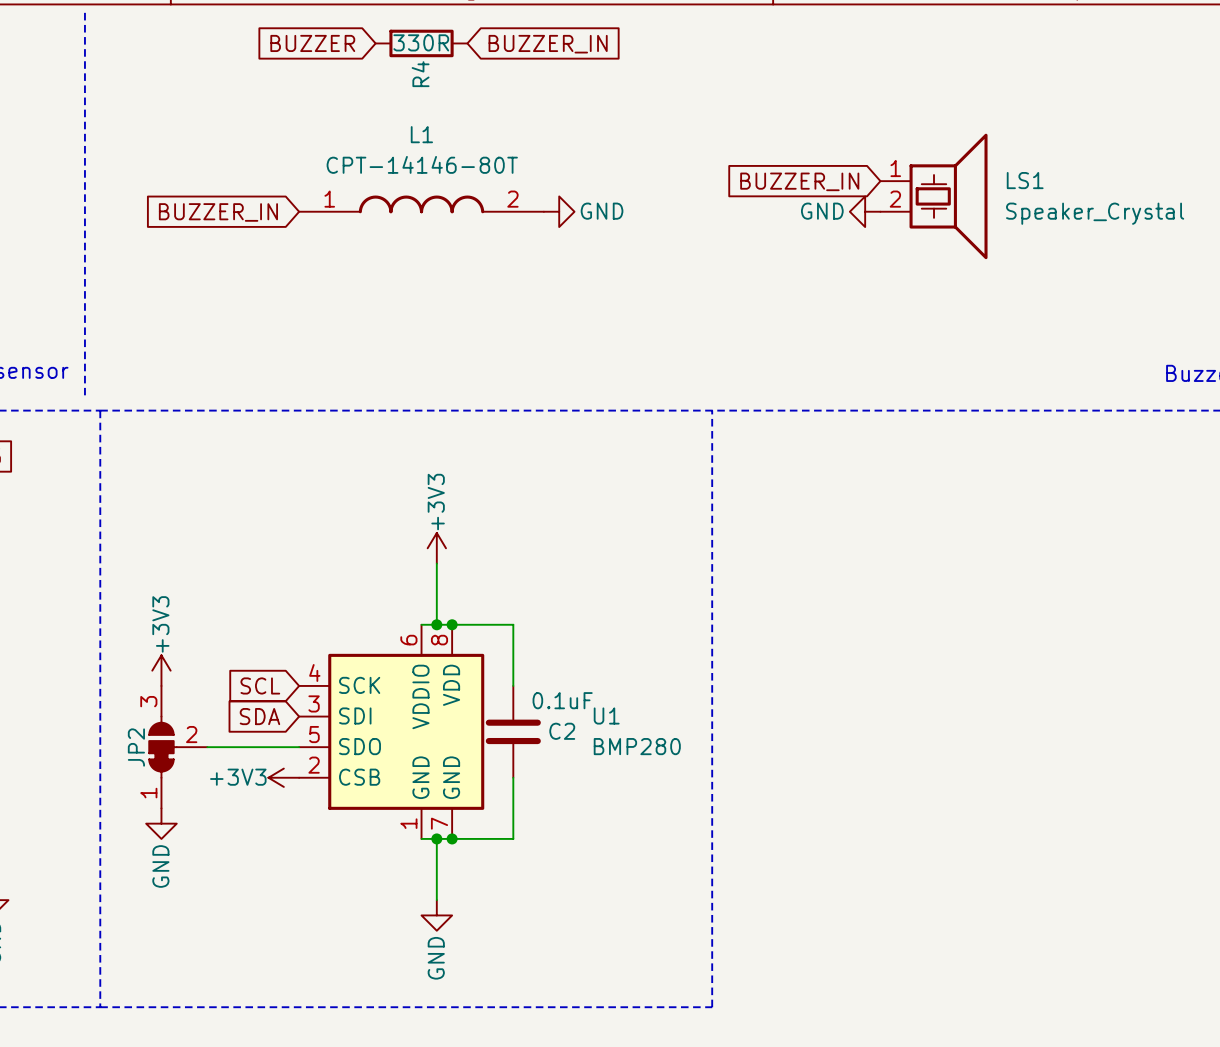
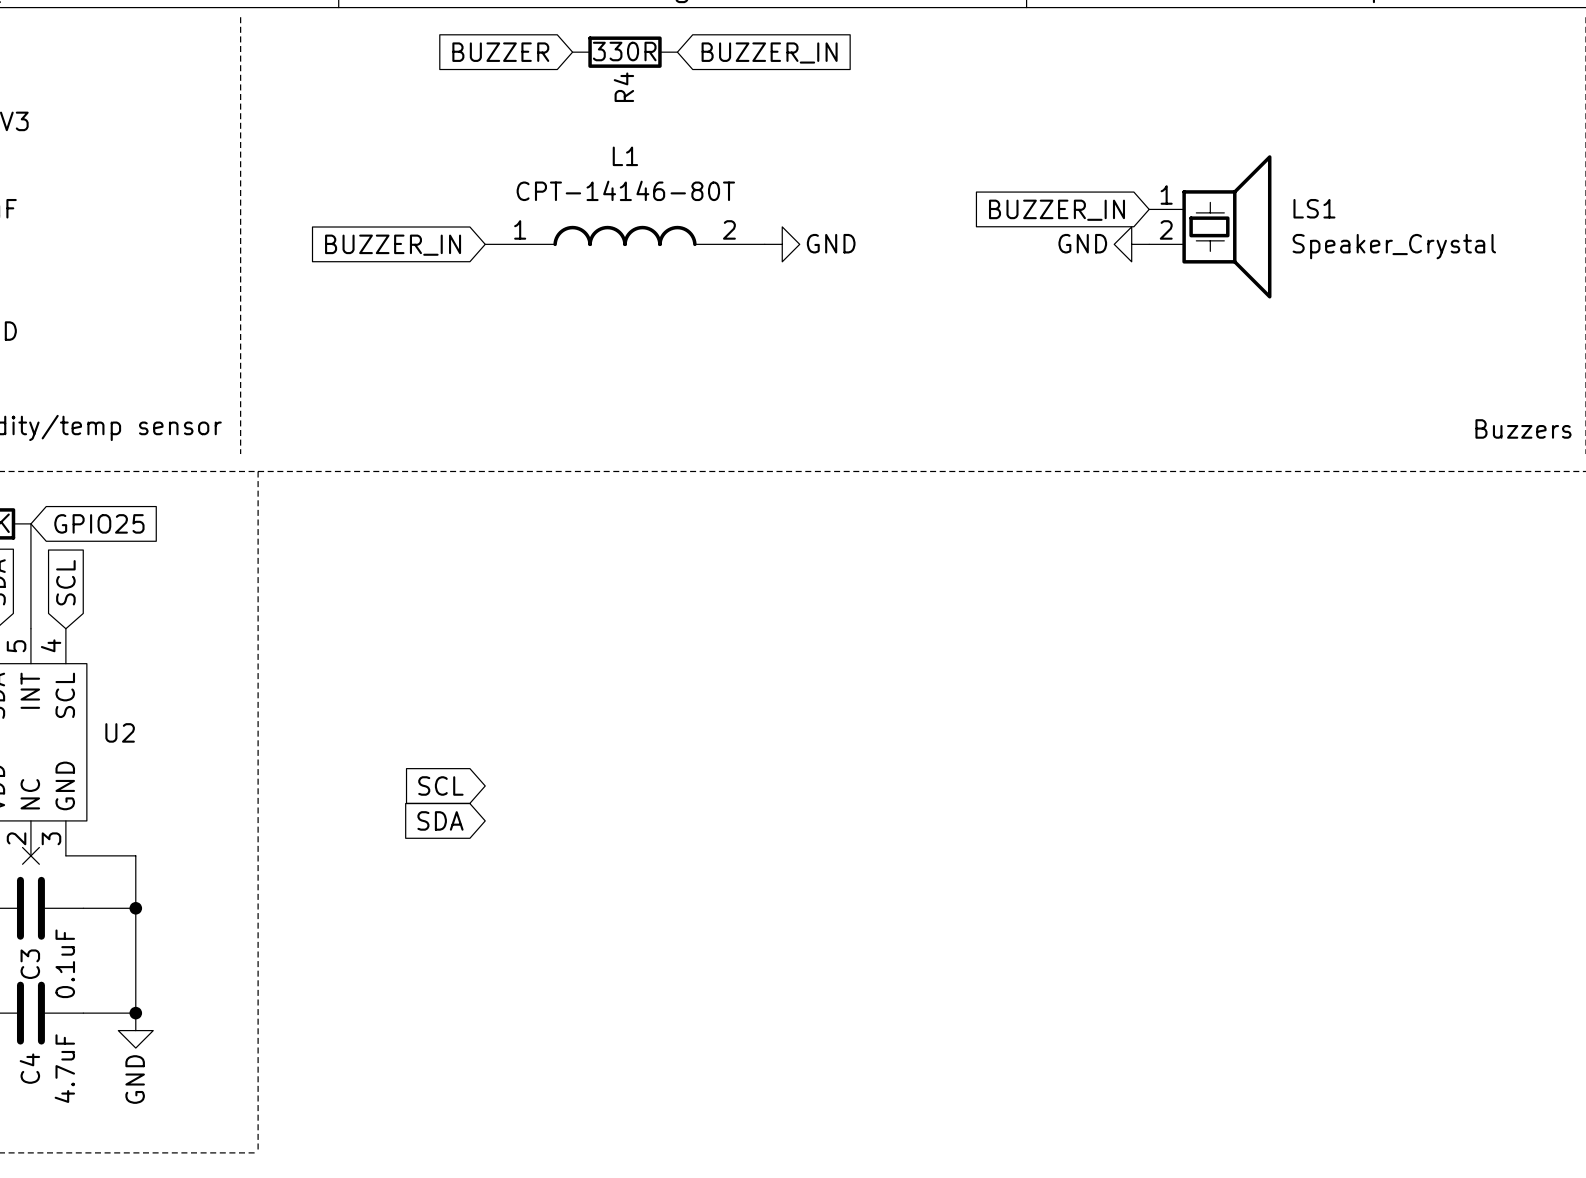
line: (712, 410) (712, 1007) (100, 1007) -> none
power symbol: +3V3 (436, 548) -> none
wire: (436, 563) (436, 624) -> none
wire: (421, 624) (513, 624) (513, 685) -> none
junction: (436, 624) -> none
junction: (452, 624) -> none
power symbol: +3V3 (161, 670) -> none
U1: BMP280 (391, 731) -> none
C2: 0.1uF (513, 731) -> none
JP2: (178, 747) -> none
wire: (207, 747) (299, 747) -> none
power symbol: +3V3 (283, 777) -> none
wire: (513, 777) (513, 838) (421, 838) -> none
power symbol: GND (161, 823) -> none
wire: (436, 838) (436, 900) -> none
junction: (436, 838) -> none
junction: (452, 838) -> none
power symbol: GND (436, 915) -> none

